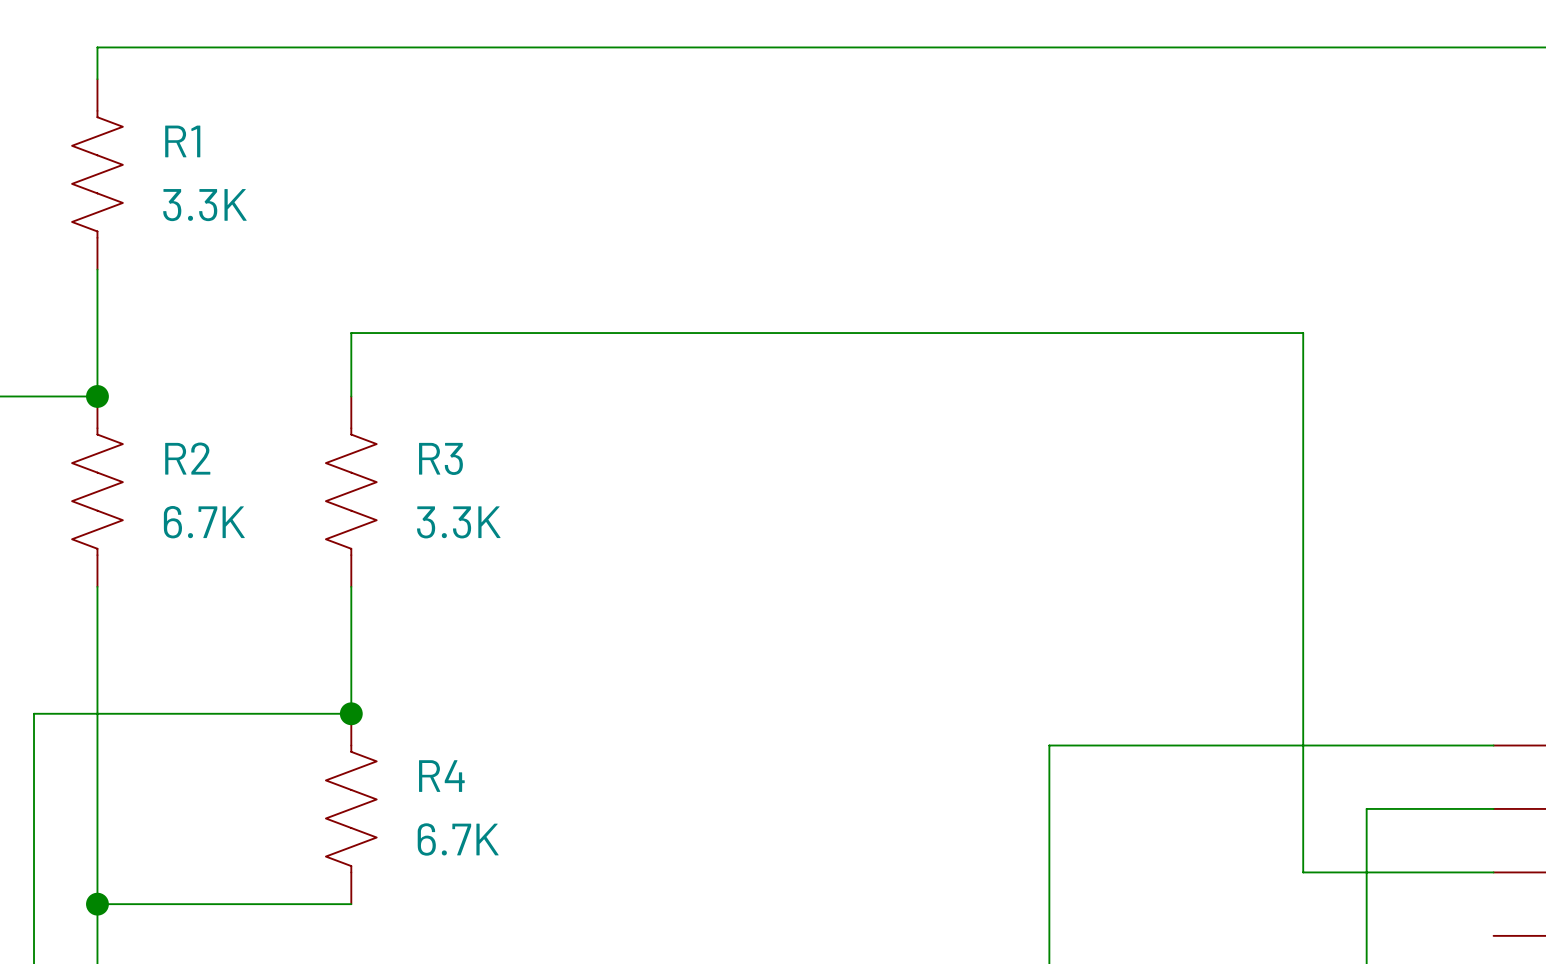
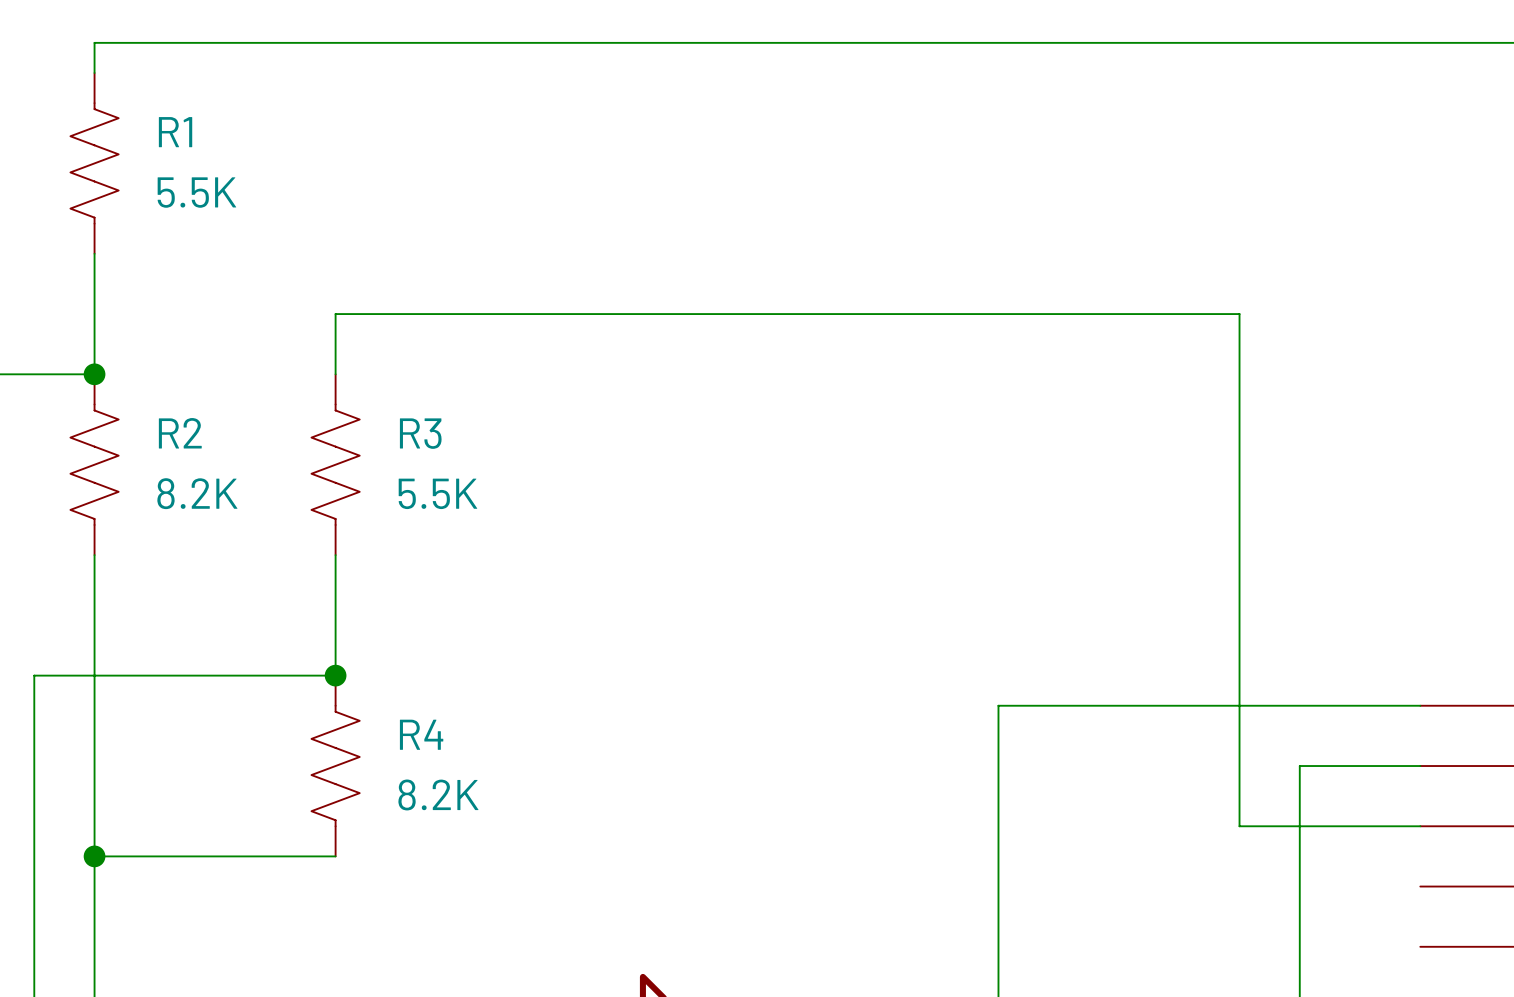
R1 value: 3.3K (204, 205) -> 5.5K (196, 192)
R2 value: 6.7K (204, 522) -> 8.2K (197, 493)
R3 value: 3.3K (458, 522) -> 5.5K (437, 493)
R4 value: 6.7K (458, 839) -> 8.2K (438, 794)

